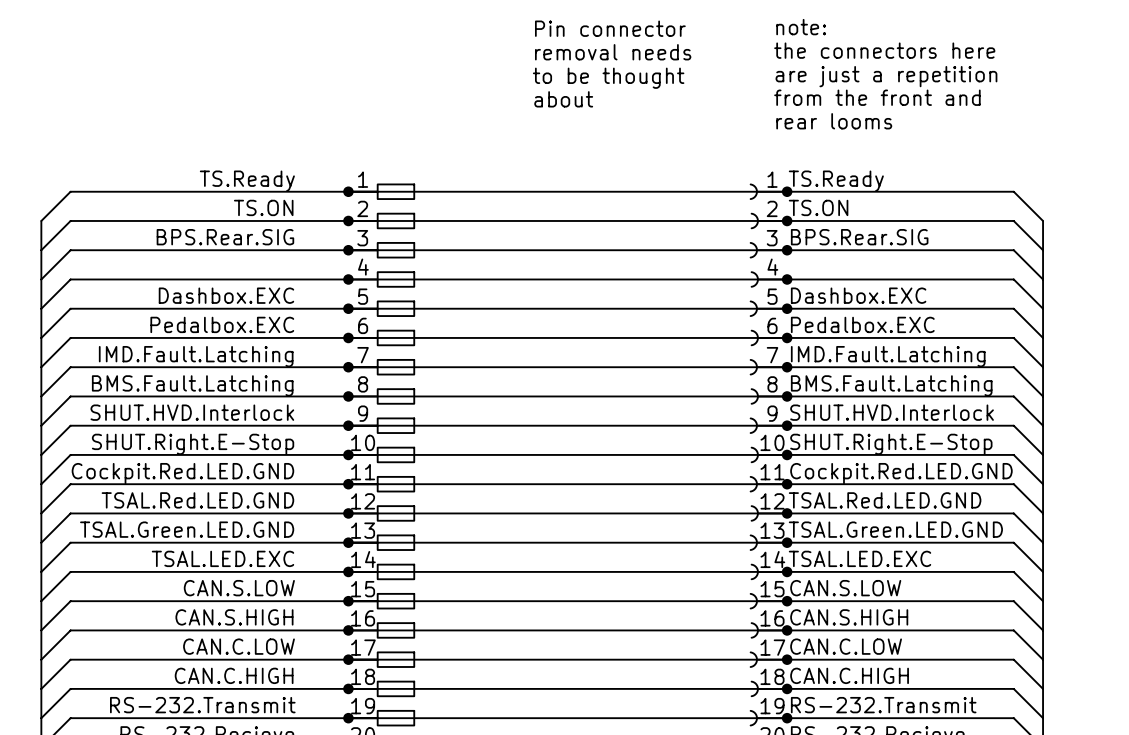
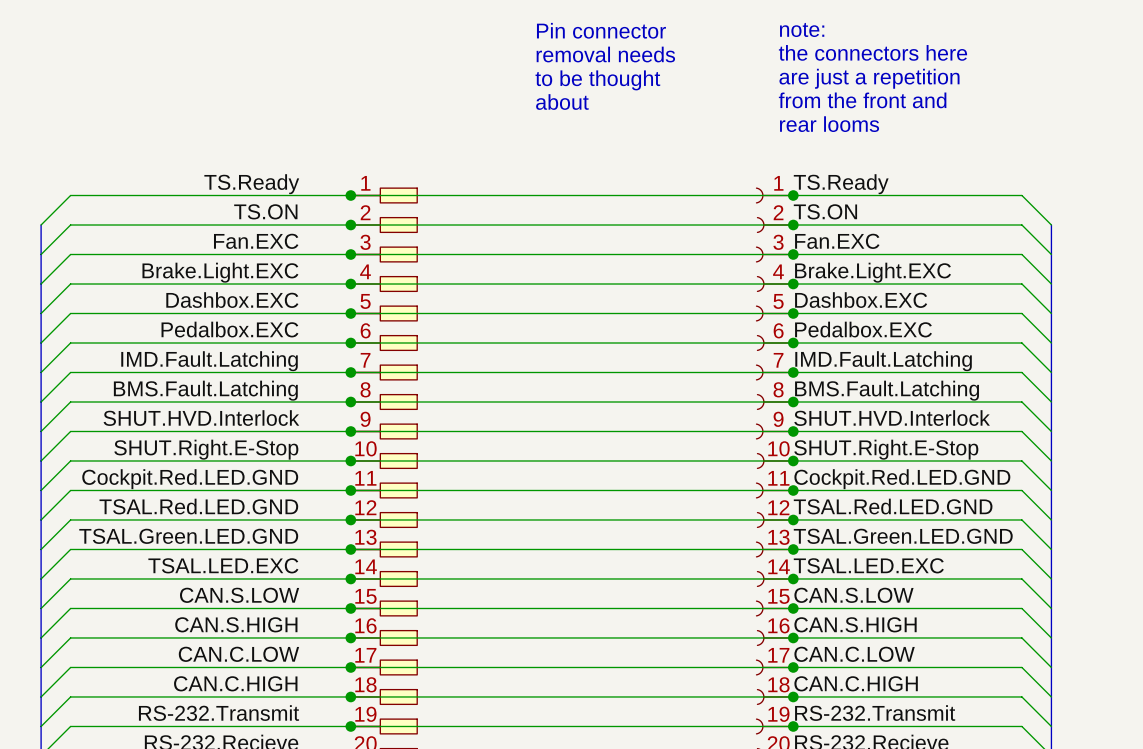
label: BPS.Rear.SIG (225, 237) -> Fan.EXC (256, 241)
label: BPS.Rear.SIG (859, 237) -> Fan.EXC (837, 241)
label: none -> Brake.Light.EXC (220, 272)
label: none -> Brake.Light.EXC (873, 272)

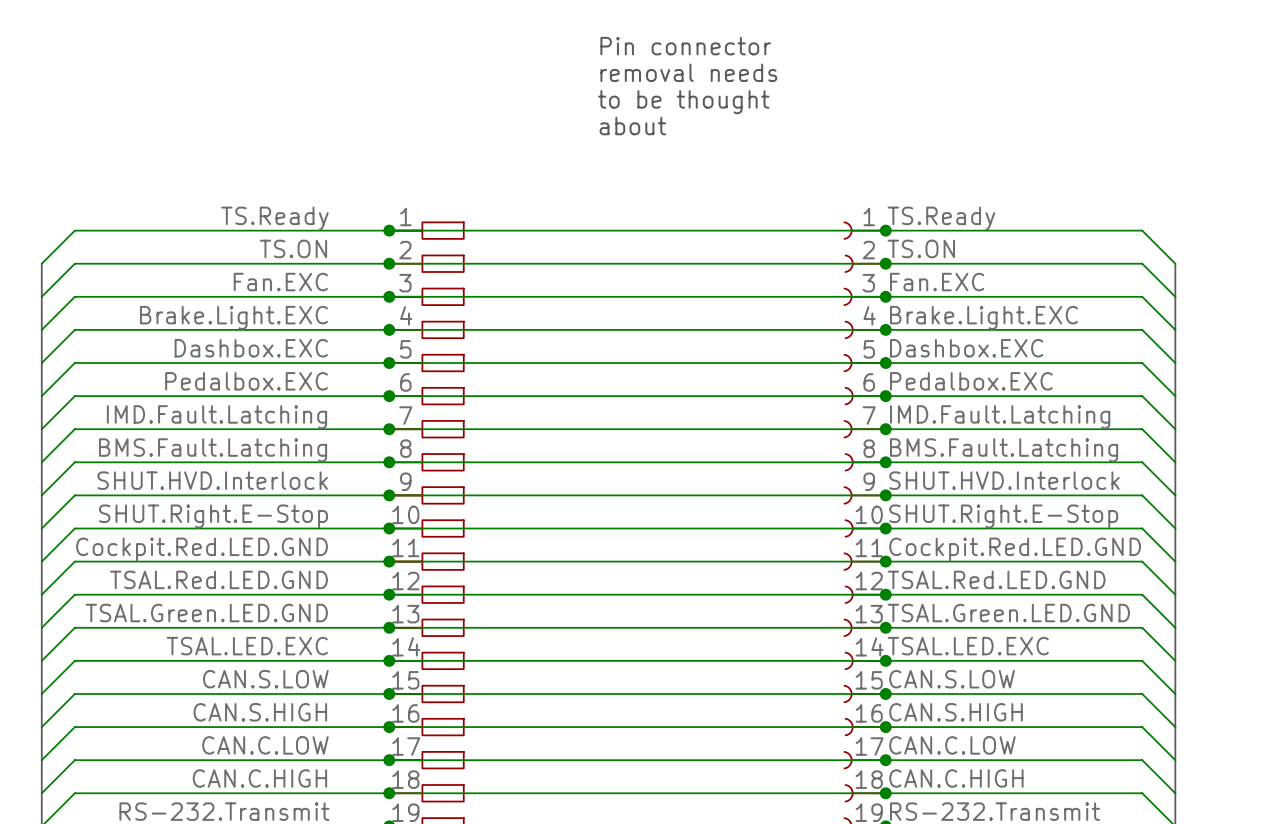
text: note: (802, 29) -> none
text: the connectors here (873, 52) -> none
text: are just a repetition (869, 78) -> none
text: from the front and (862, 100) -> none
text: rear looms (829, 124) -> none

